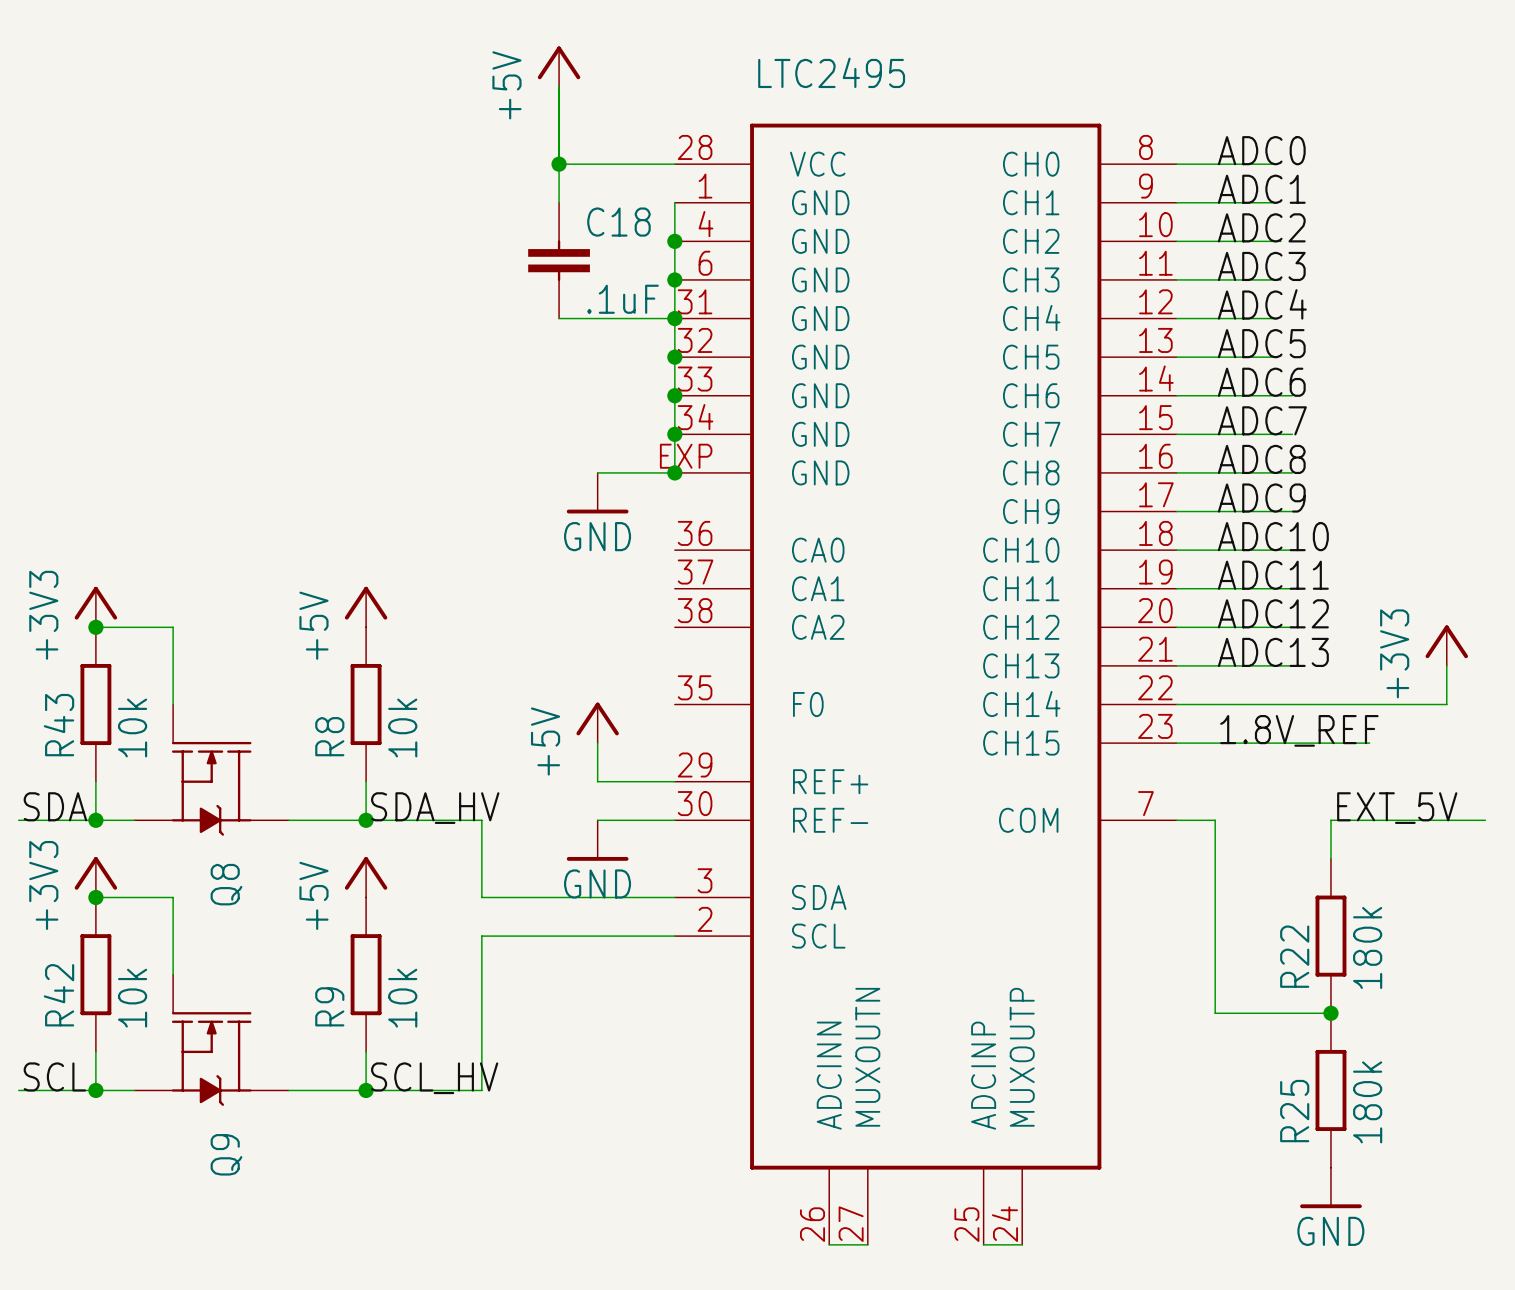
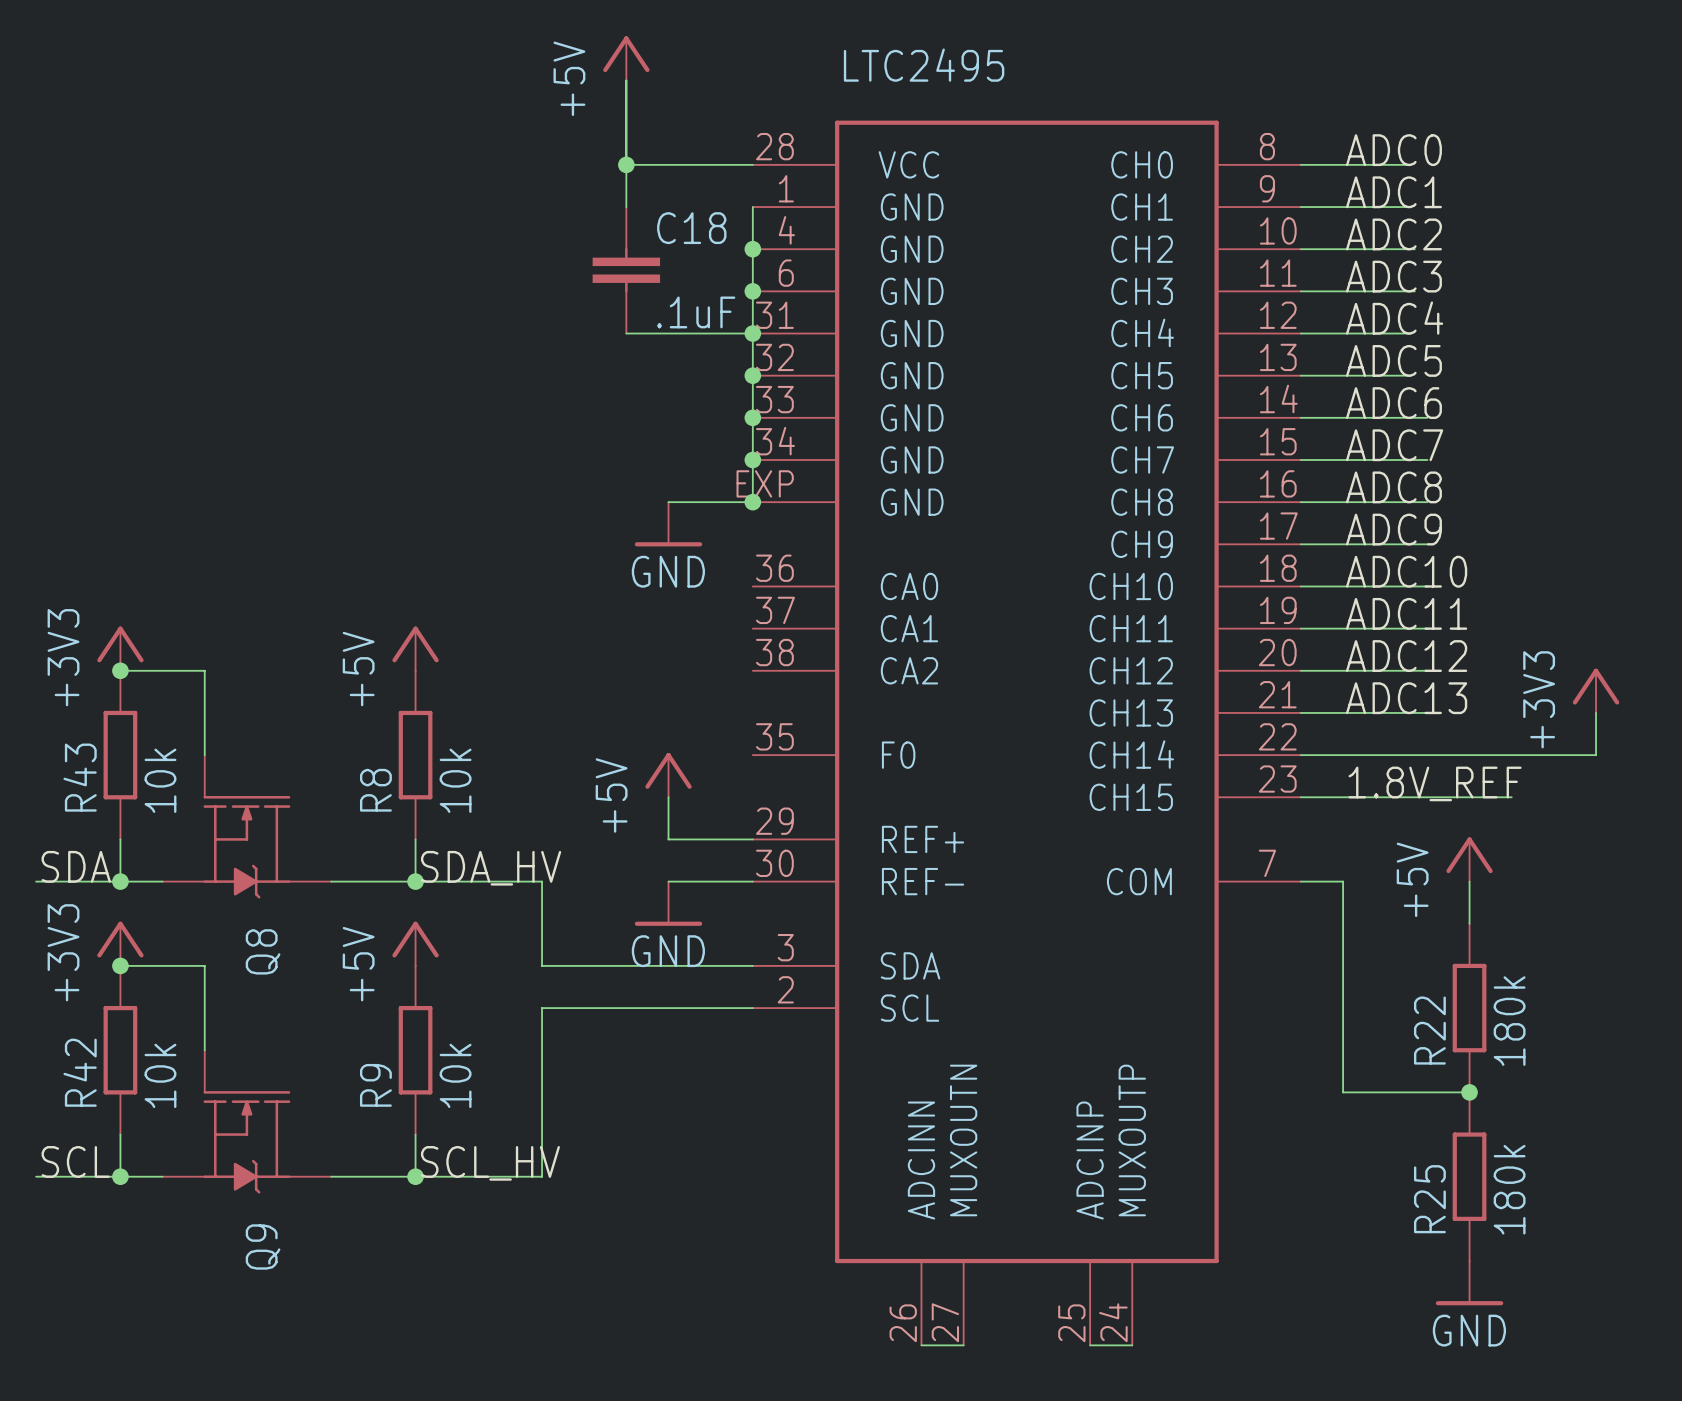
power symbol: none -> +5V (1469, 859)
label: EXT_5V (1397, 808) -> none
wire: (1330, 820) (1485, 820) -> none

